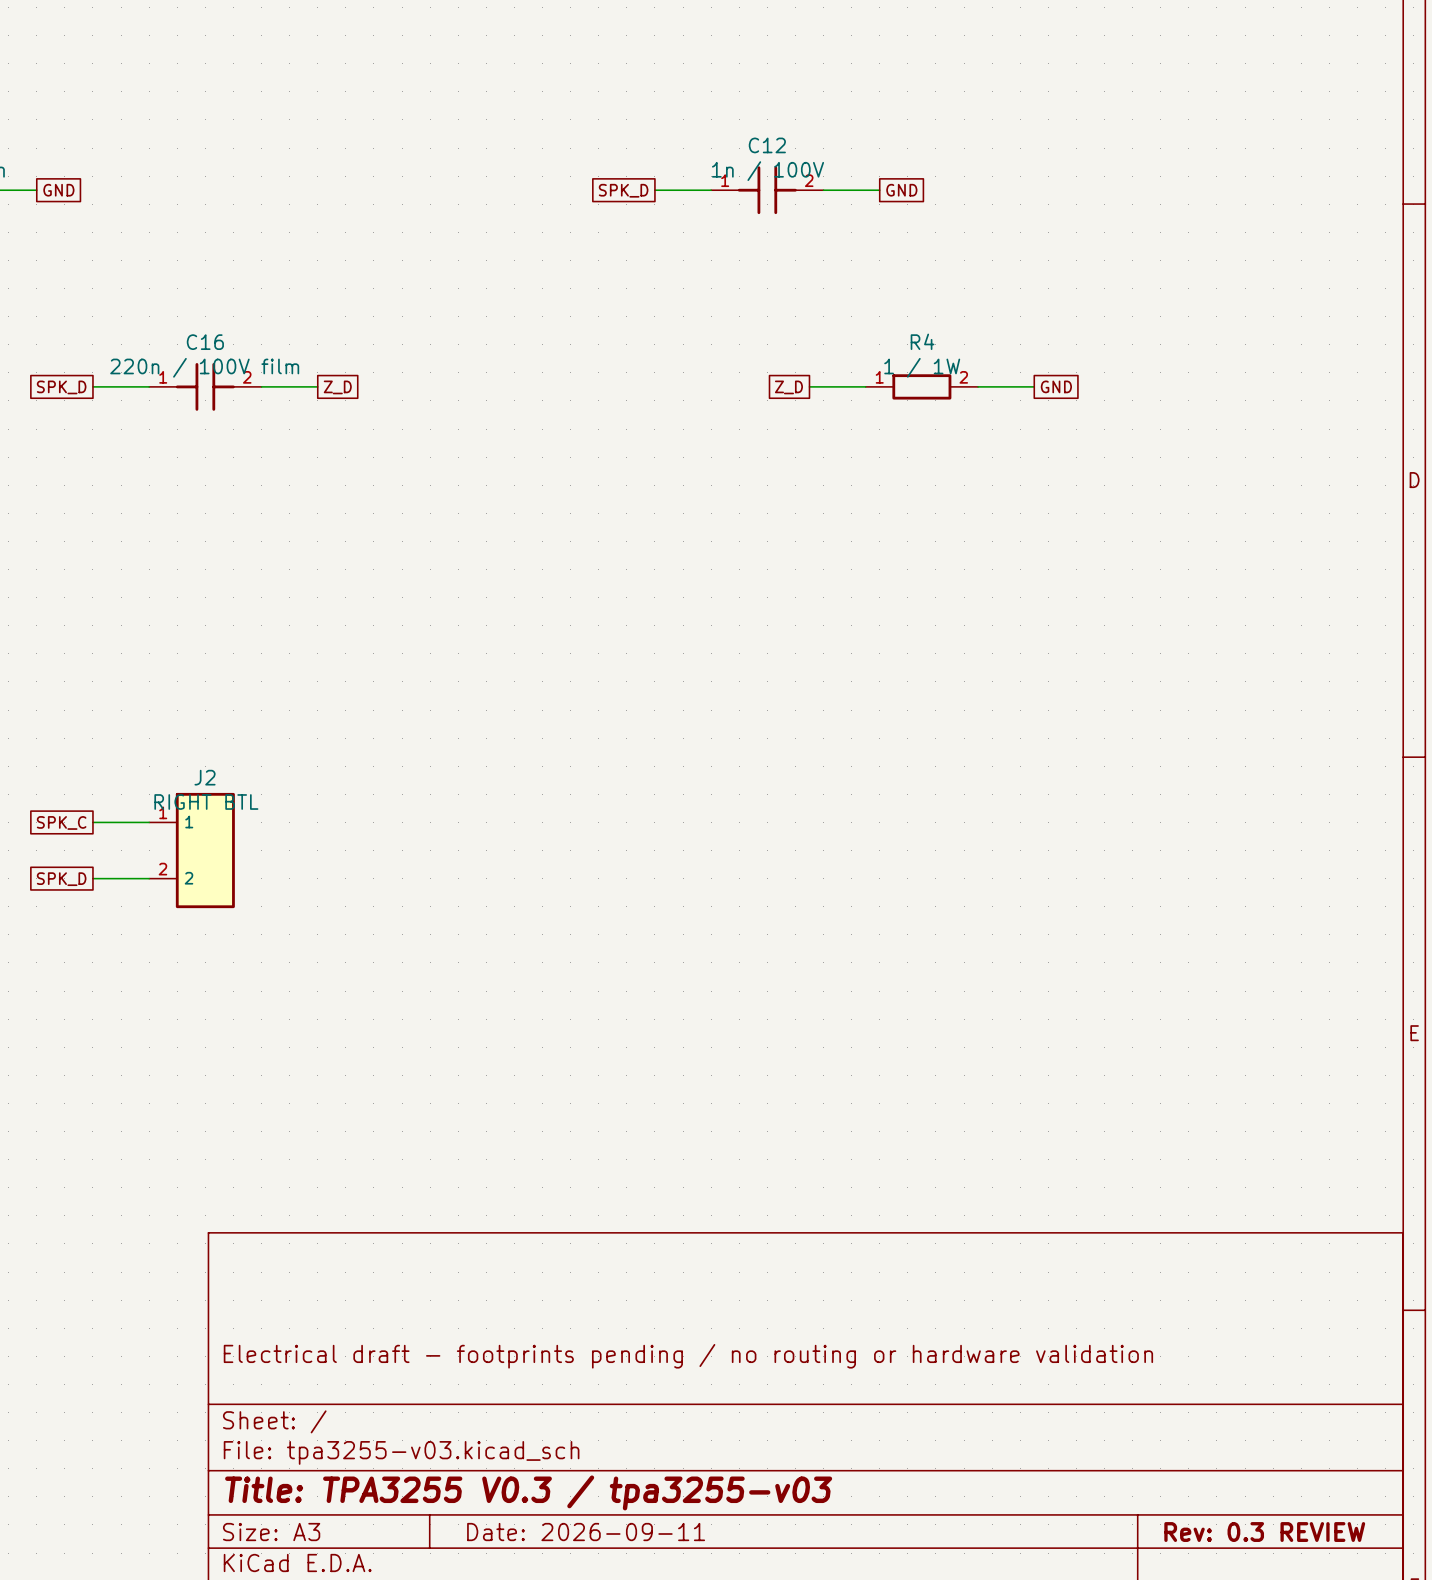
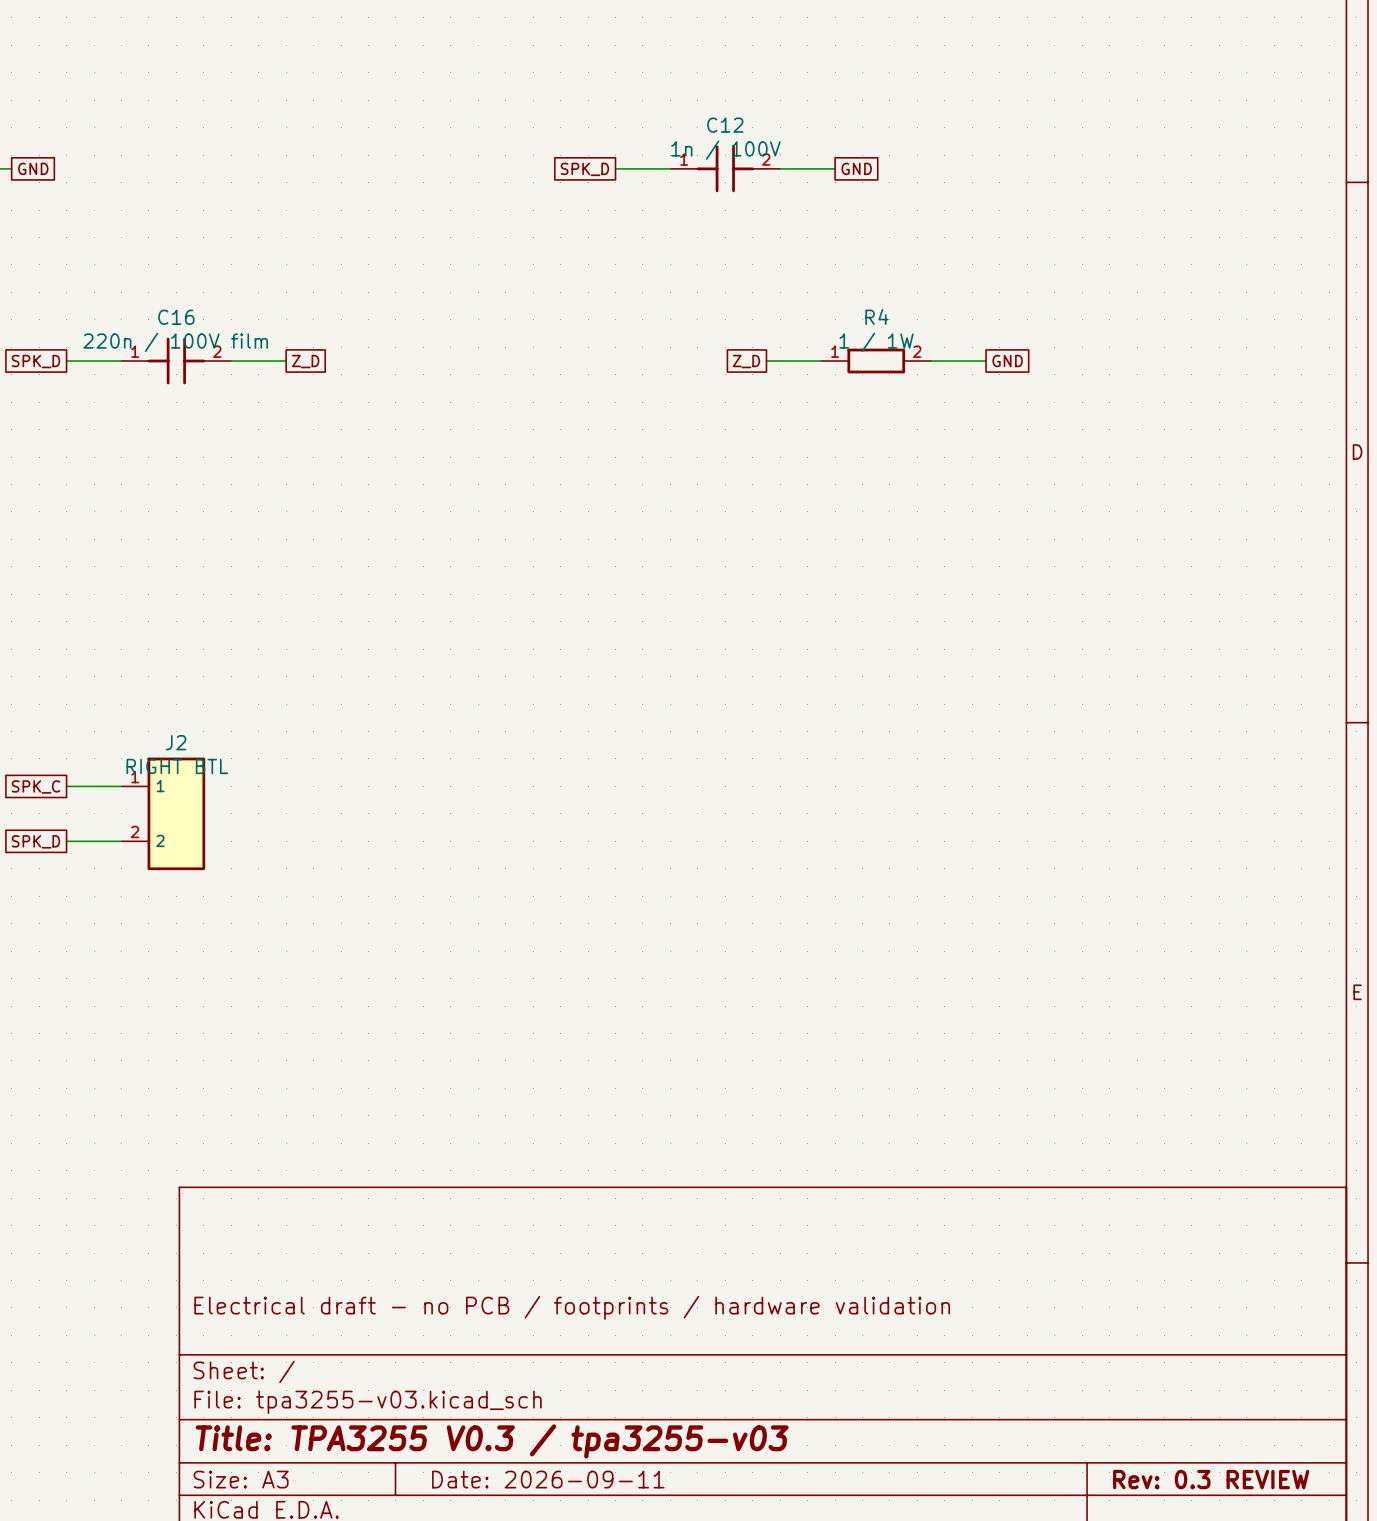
title block: Electrical draft - footprints pending / no routing or hardware validation (688, 1356) -> Electrical draft - no PCB / footprints / hardware validation (572, 1307)

